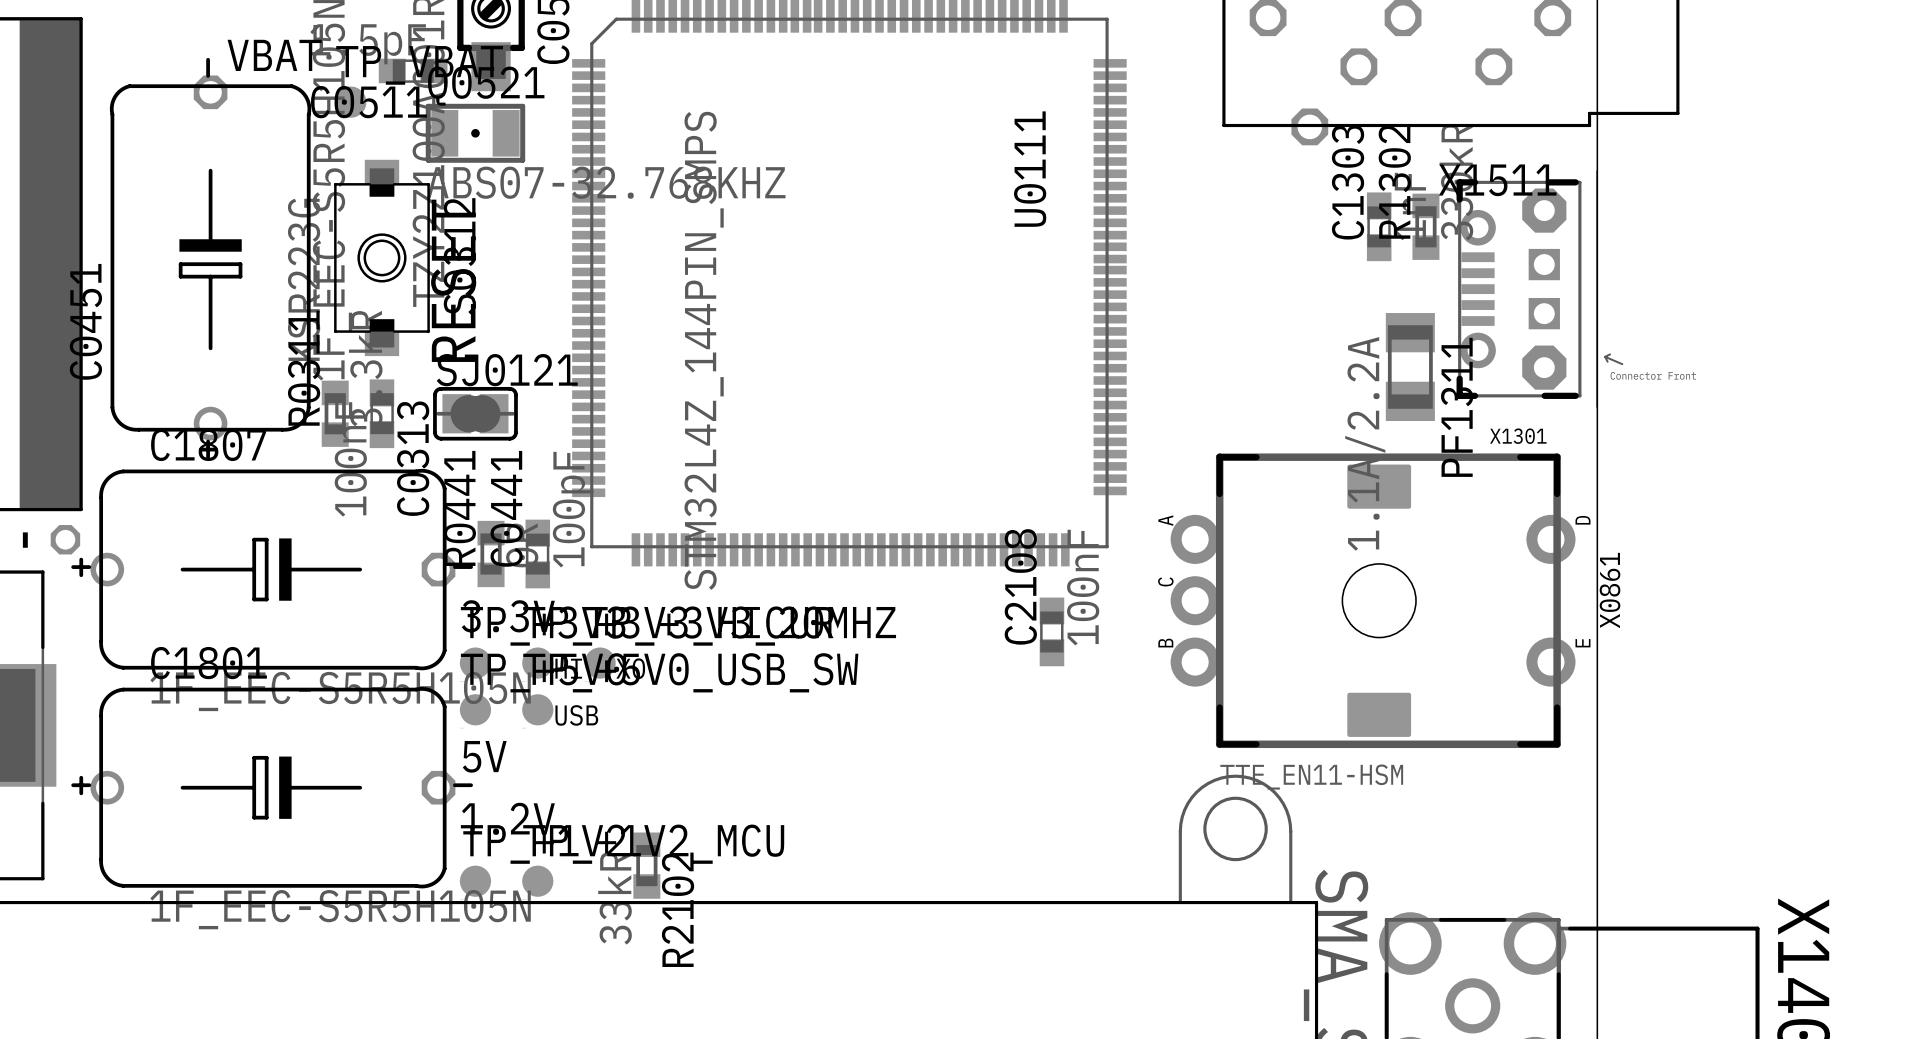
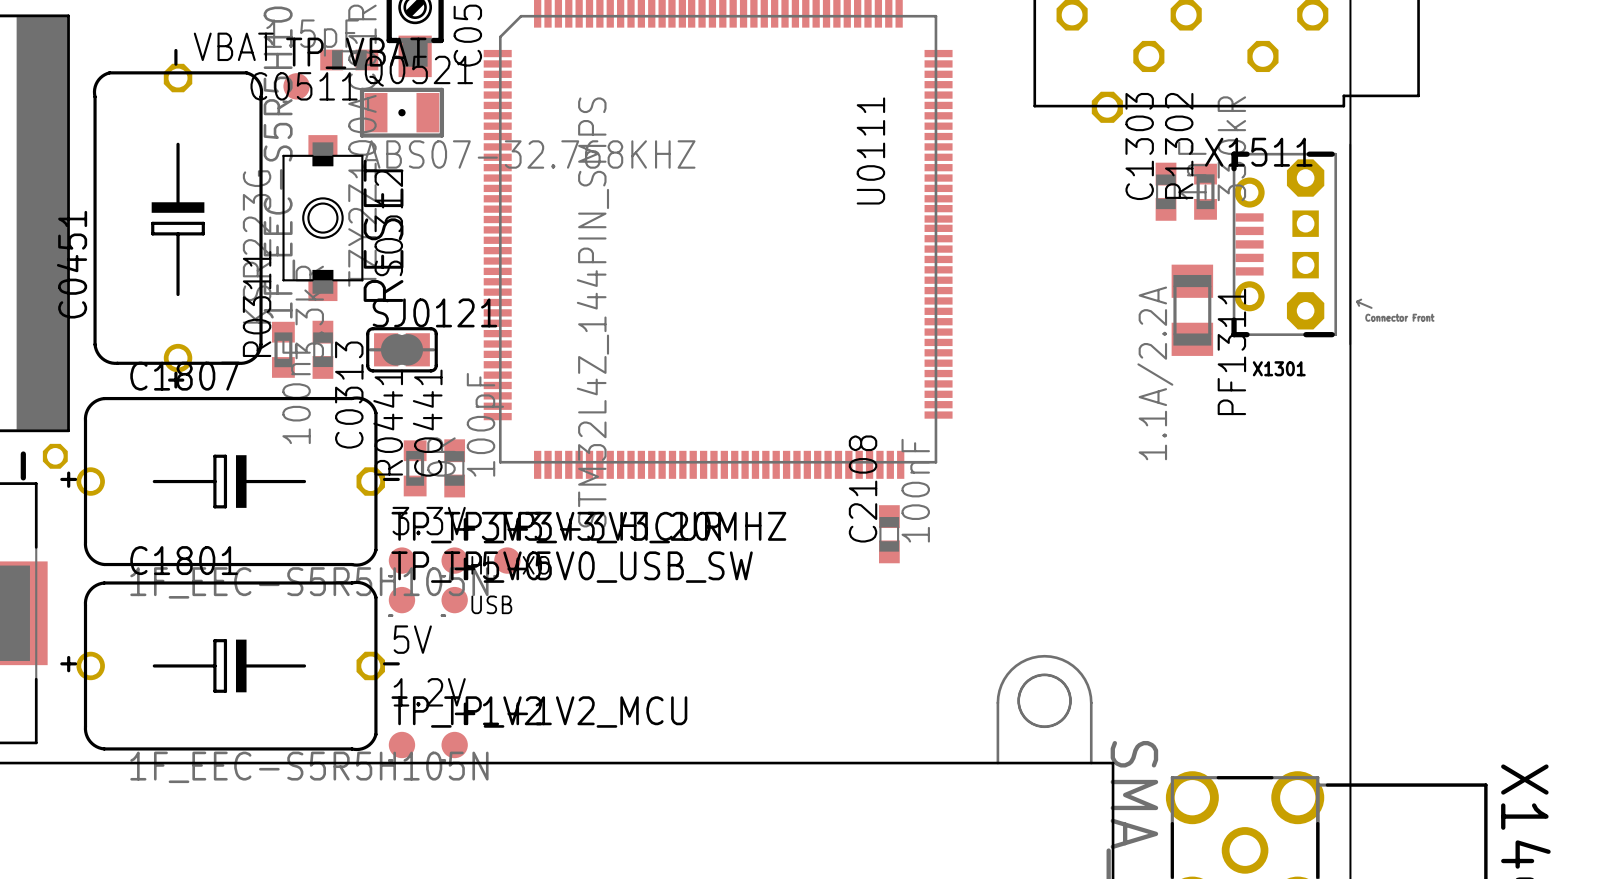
X0861: TTE_EN11-HSM (1373, 600) -> none
R2102: 33kR (646, 865) -> none

